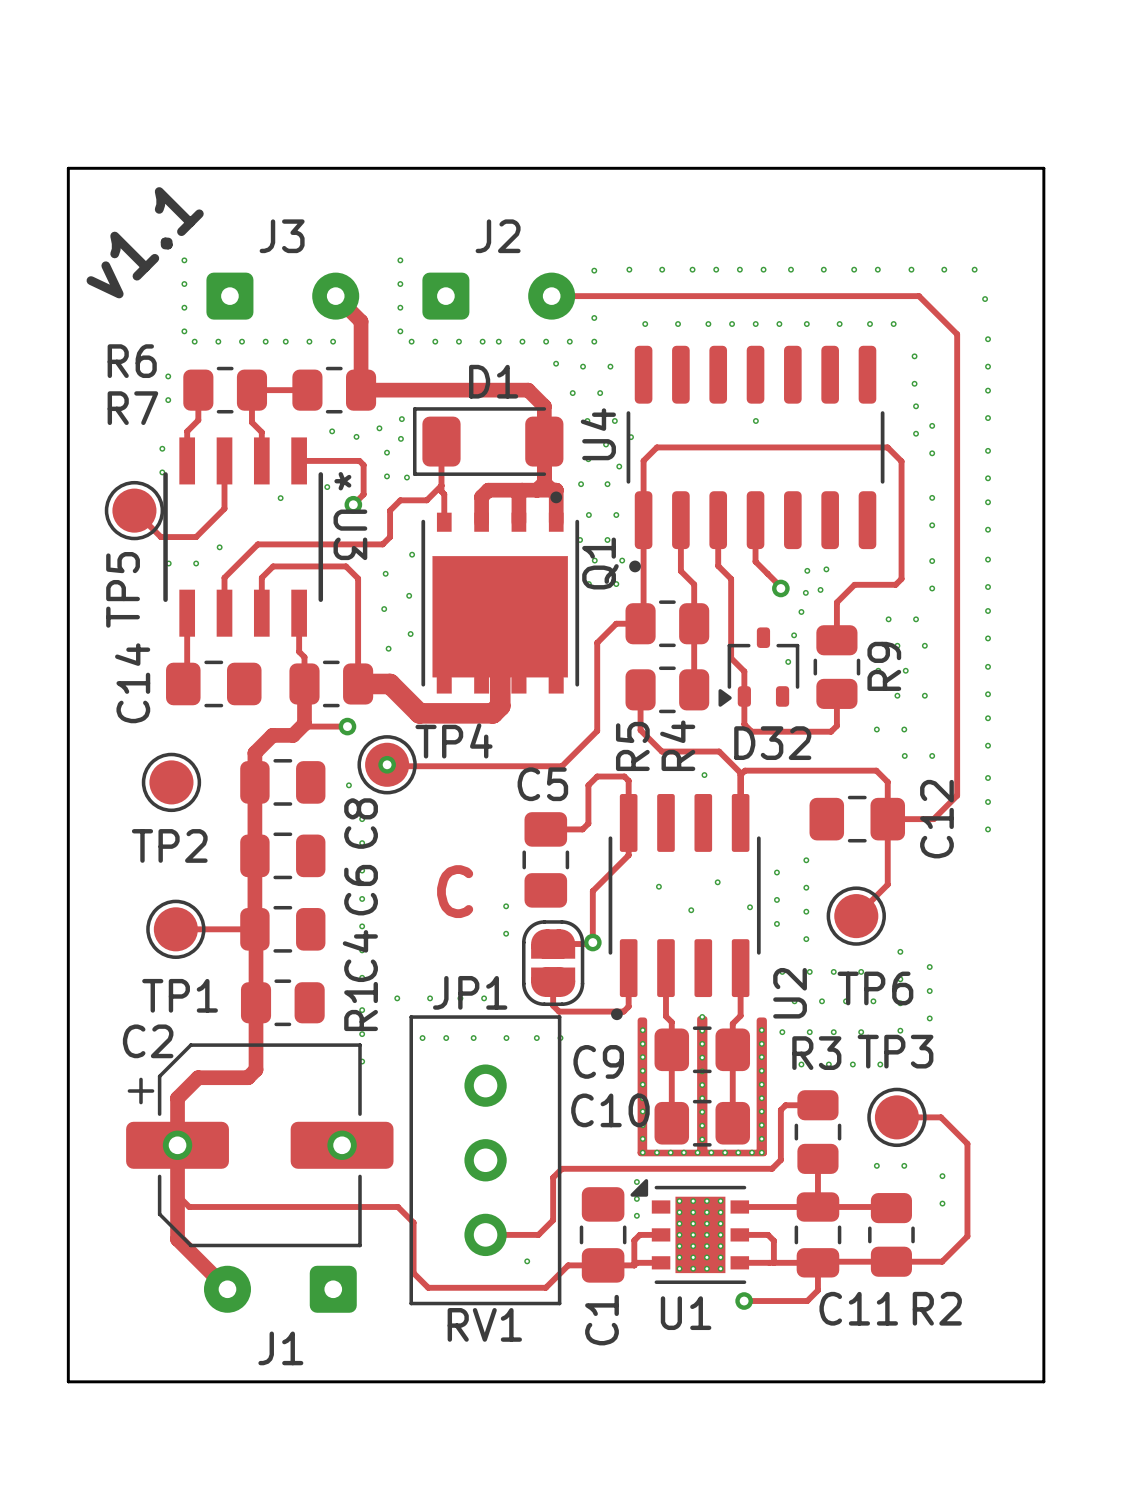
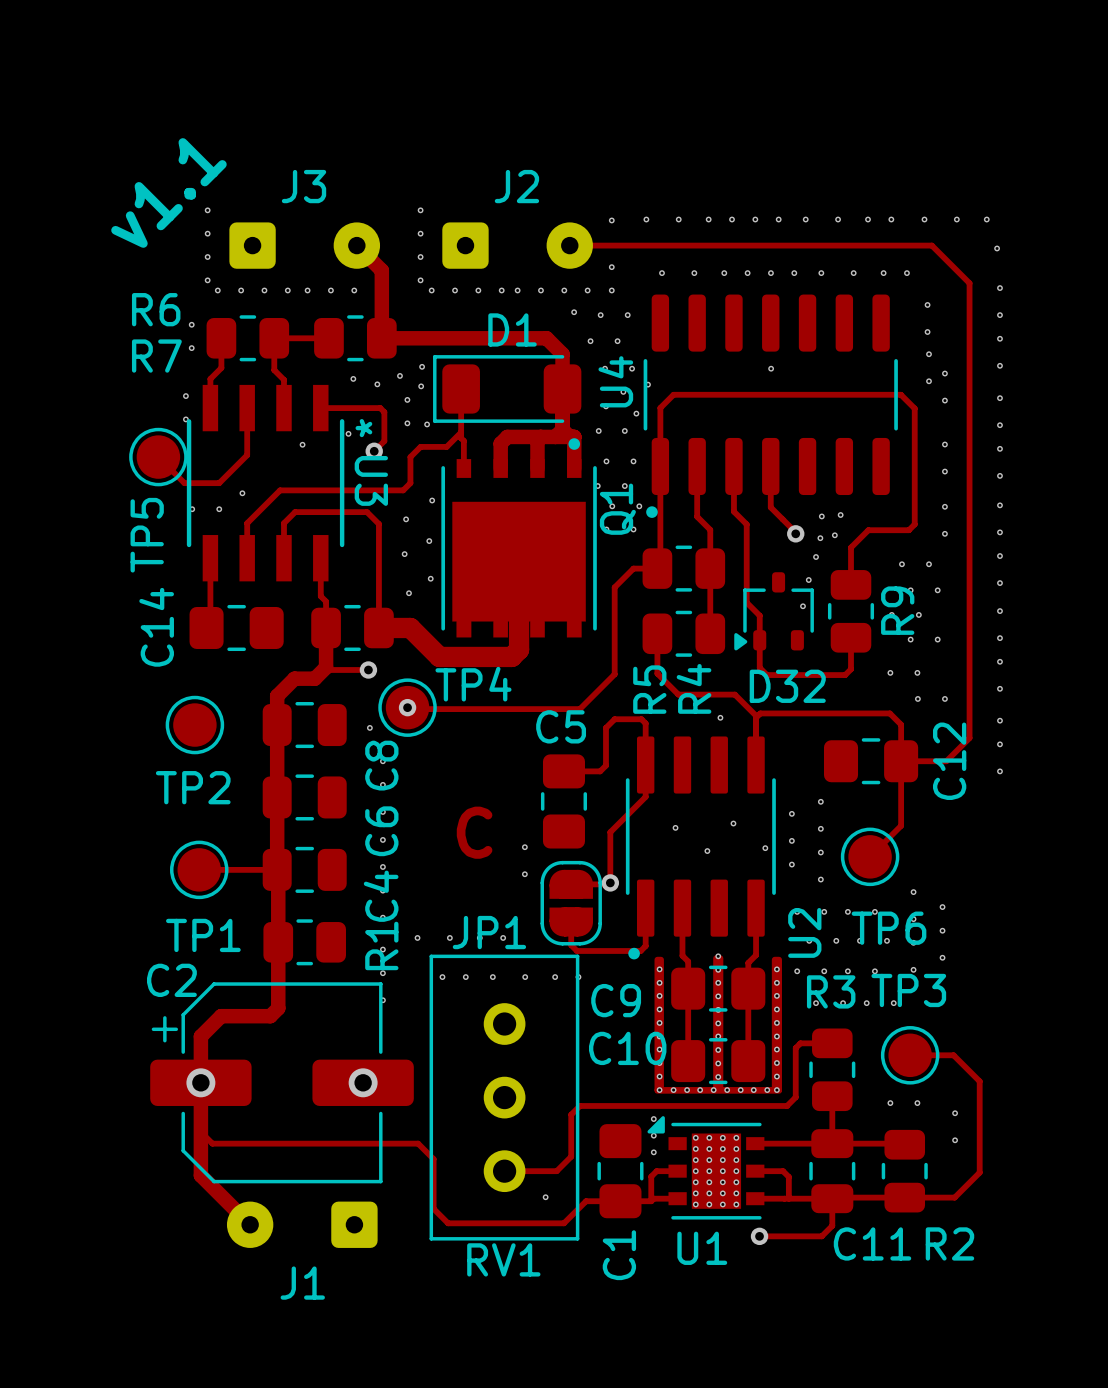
board edge: (68, 168) (1043, 168) (1043, 1381) (68, 1381) (68, 168) -> none

